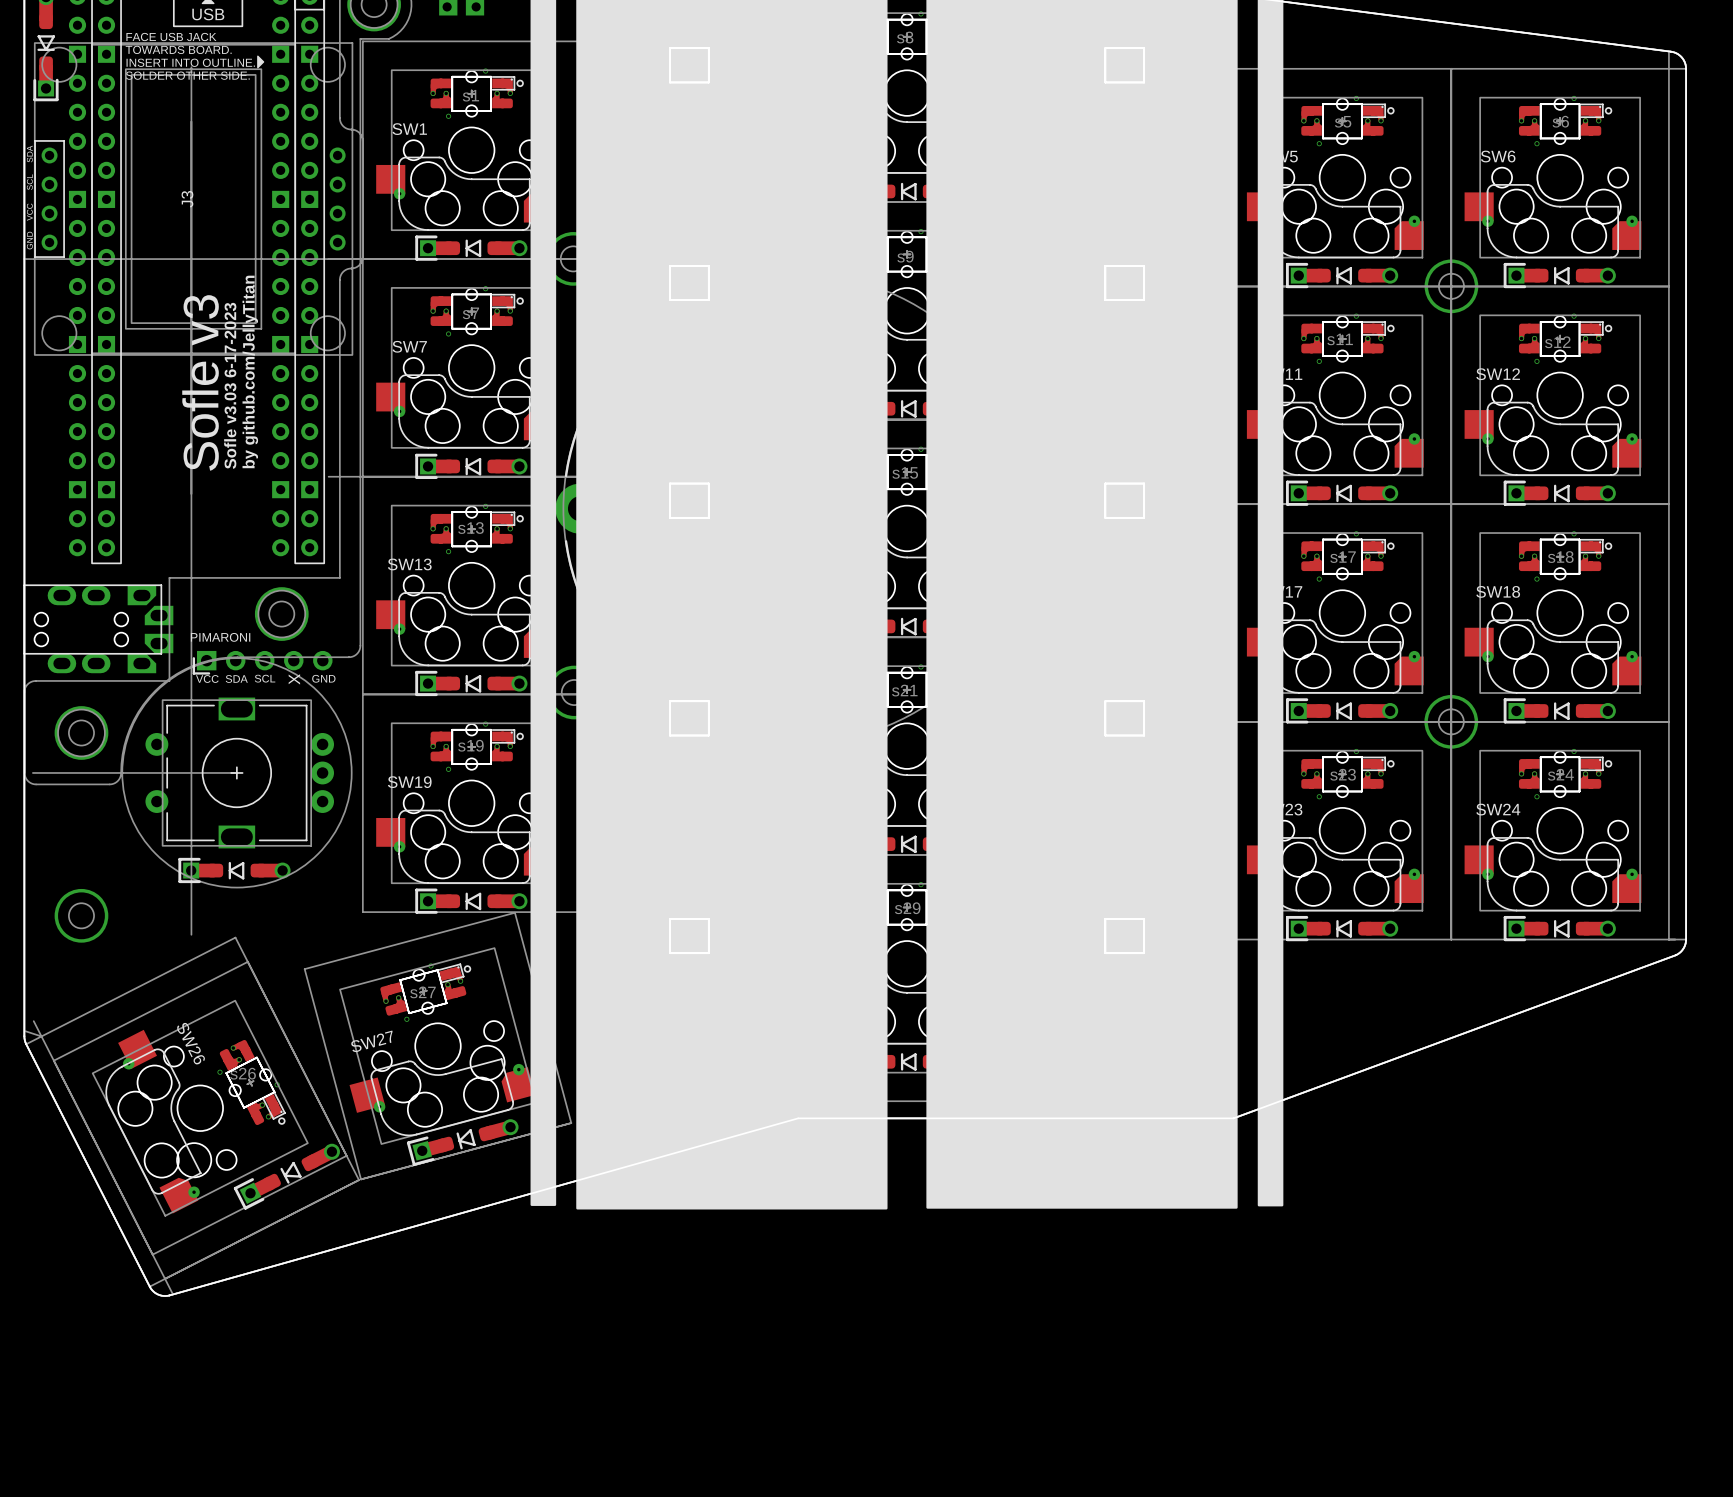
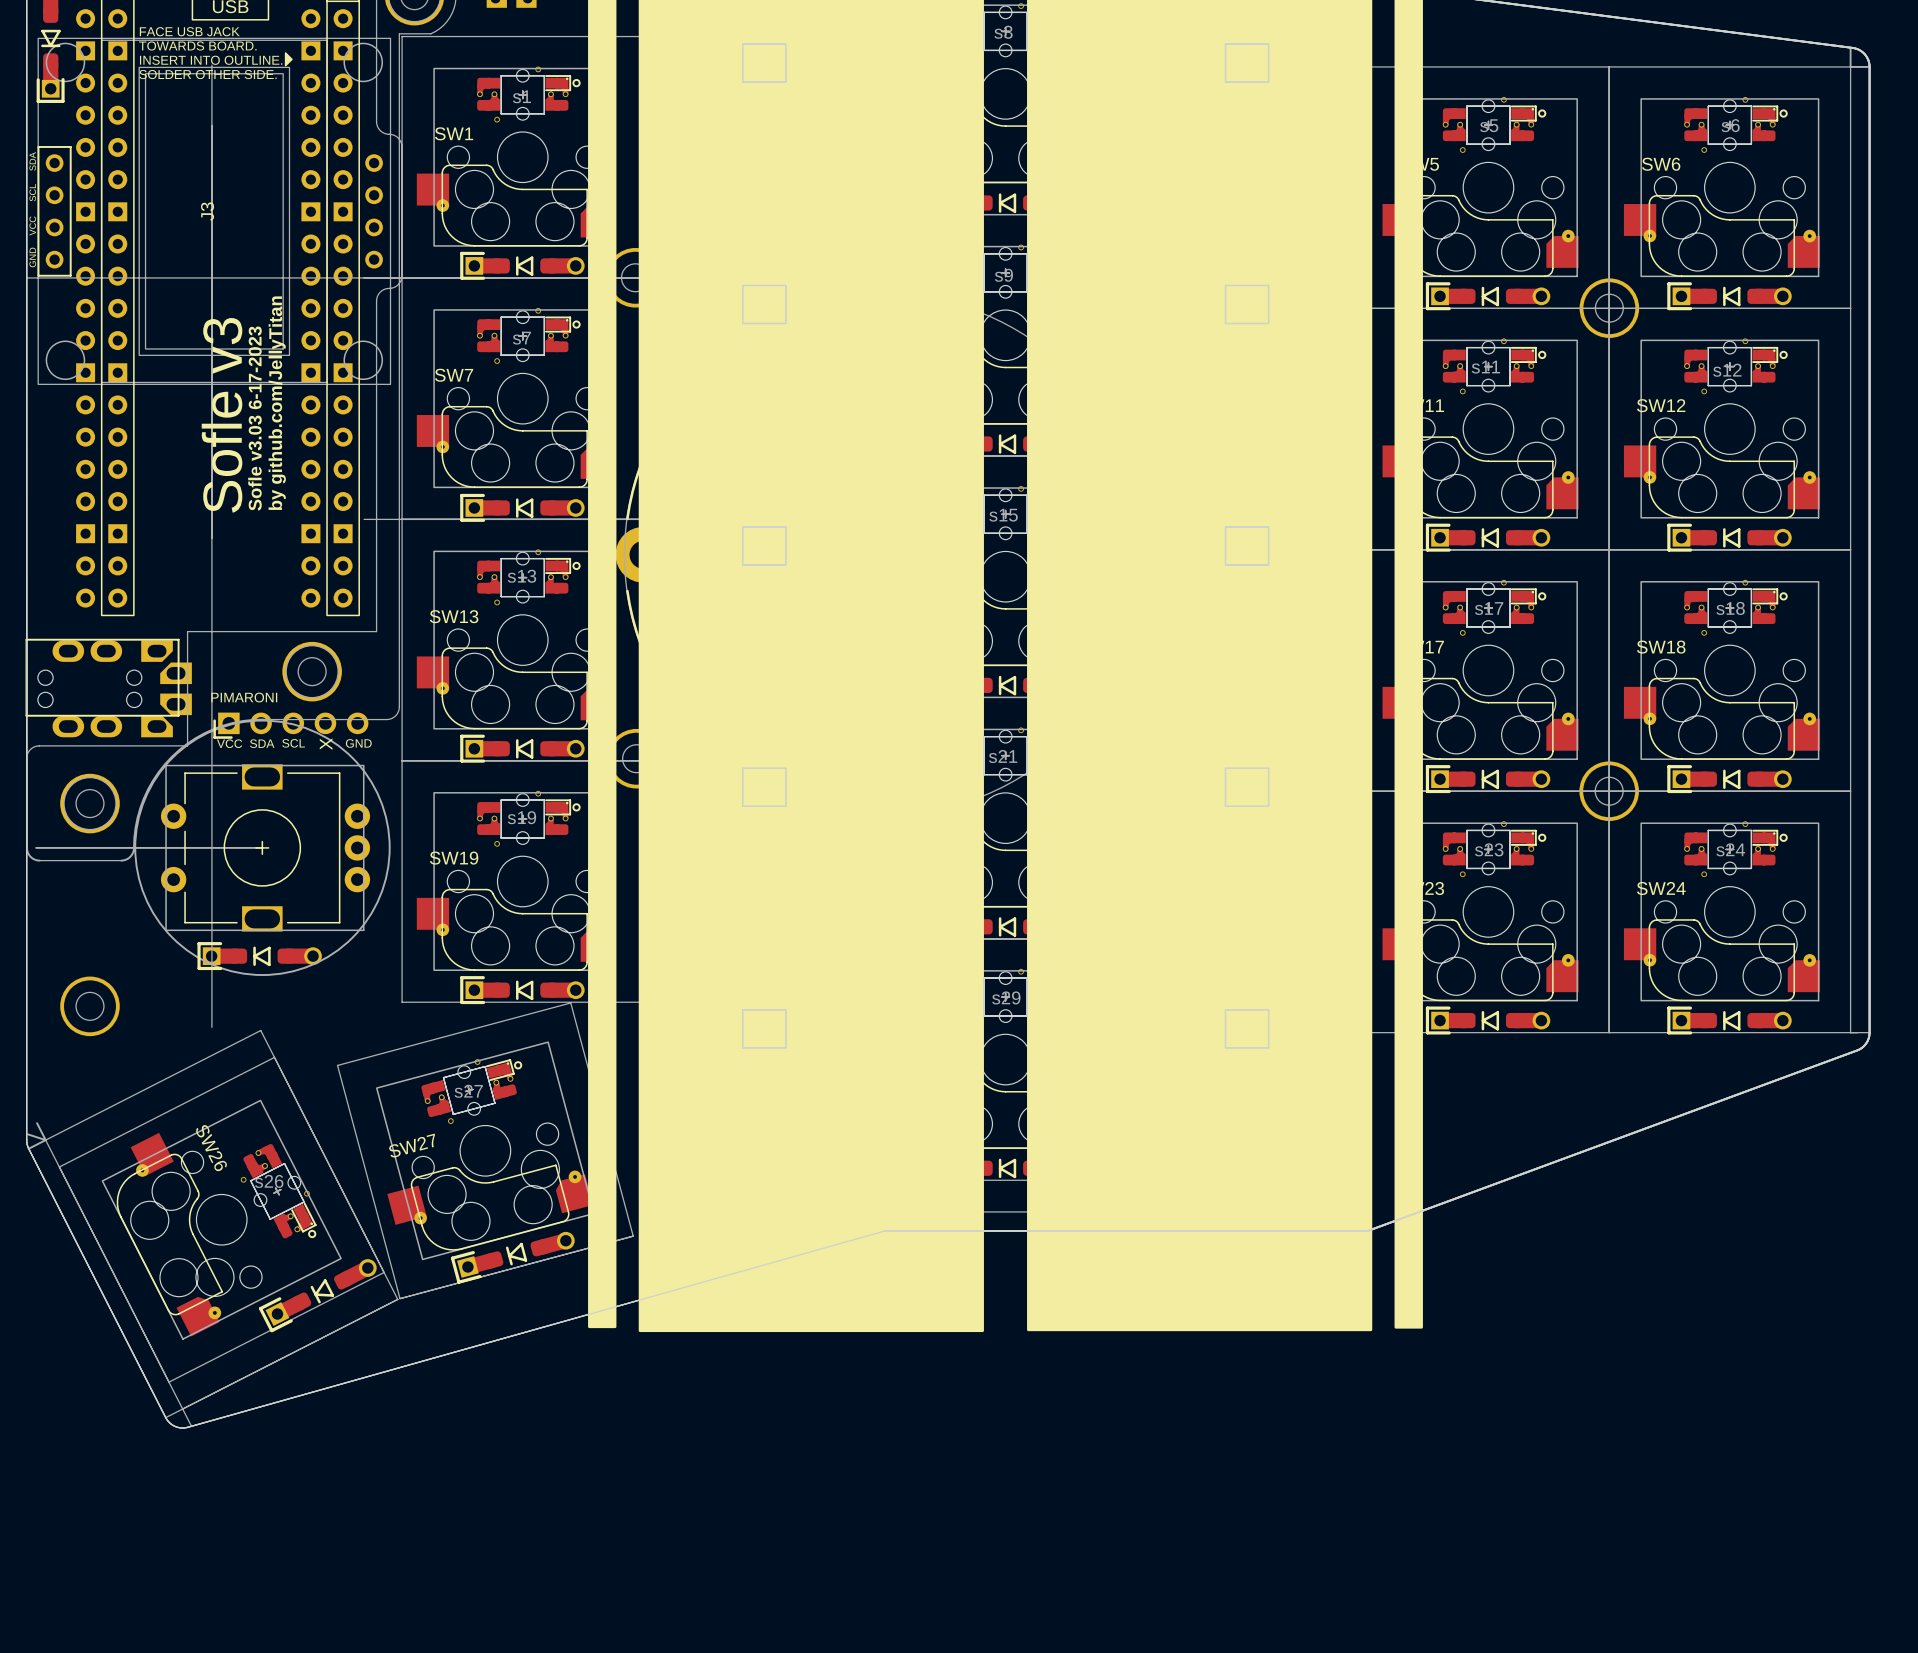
part footprint: [145, 697, 335, 849] -> [160, 764, 371, 932]

